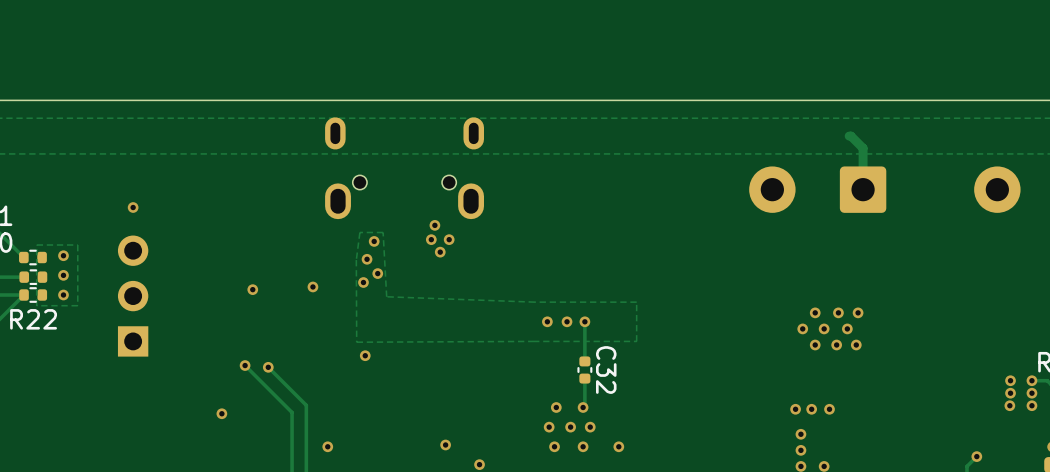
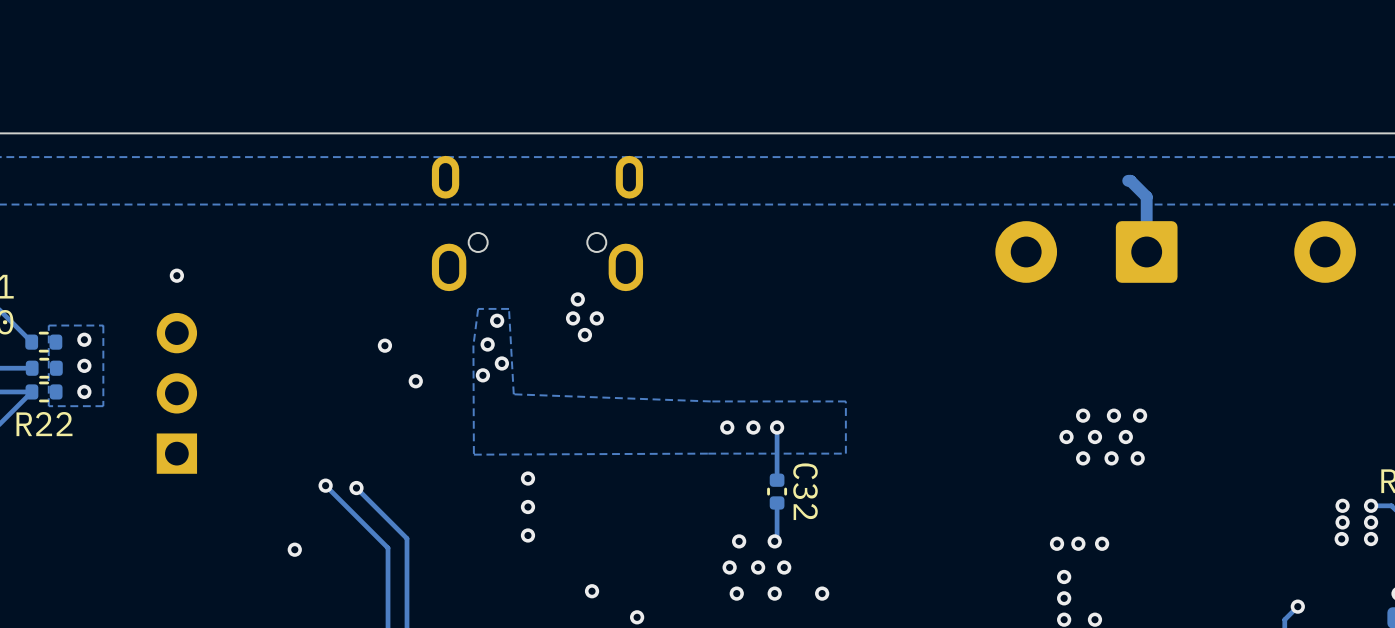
via position: (252, 289) -> (384, 345)
via: (365, 355) -> none
via: none -> (527, 478)
via: none -> (527, 507)
via: none -> (527, 535)
via: (327, 446) -> none

